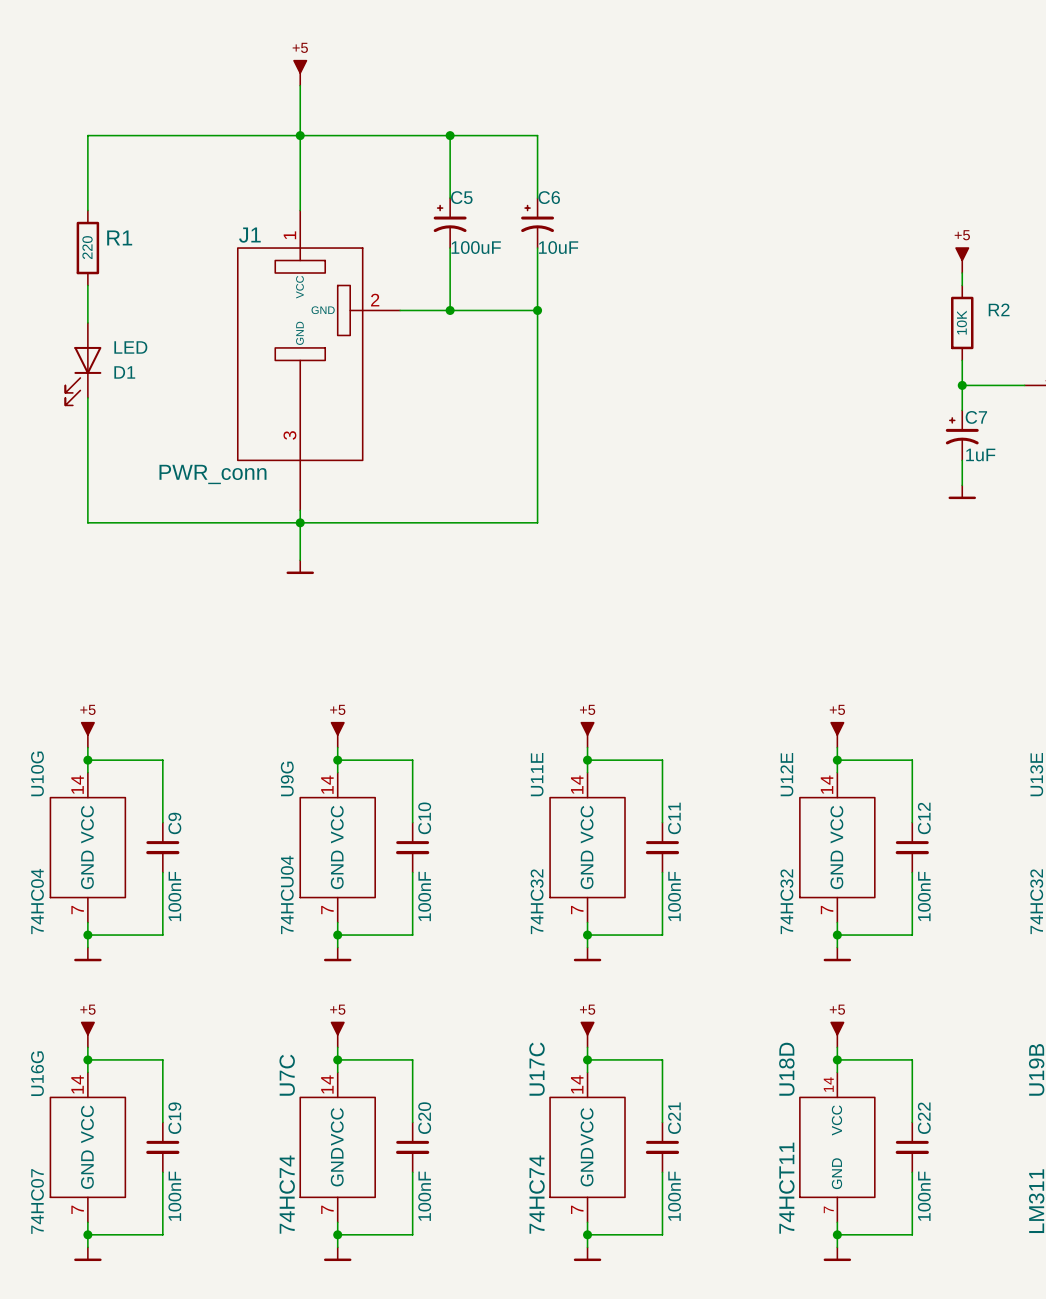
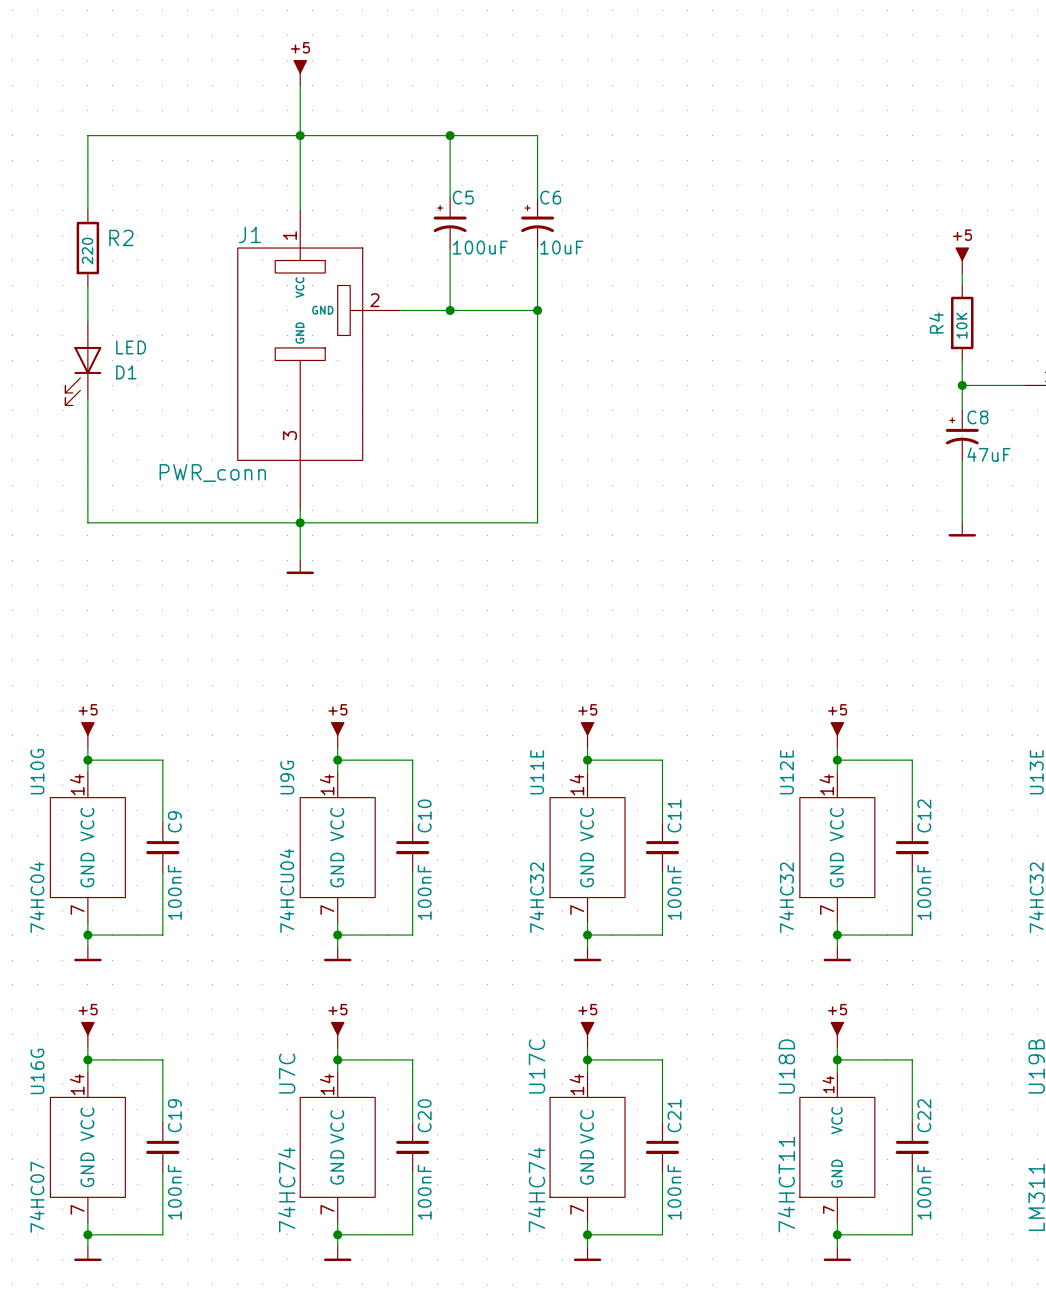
R1 name: R1 (119, 237) -> R2 (121, 237)
R2 name: R2 (999, 309) -> R4 (936, 323)
C7 name: C7 (976, 417) -> C8 (977, 417)
C7 value: 1uF (980, 454) -> 47uF (988, 454)
wire: none -> (962, 485) (962, 522)
power symbol position: (962, 492) -> (962, 529)

